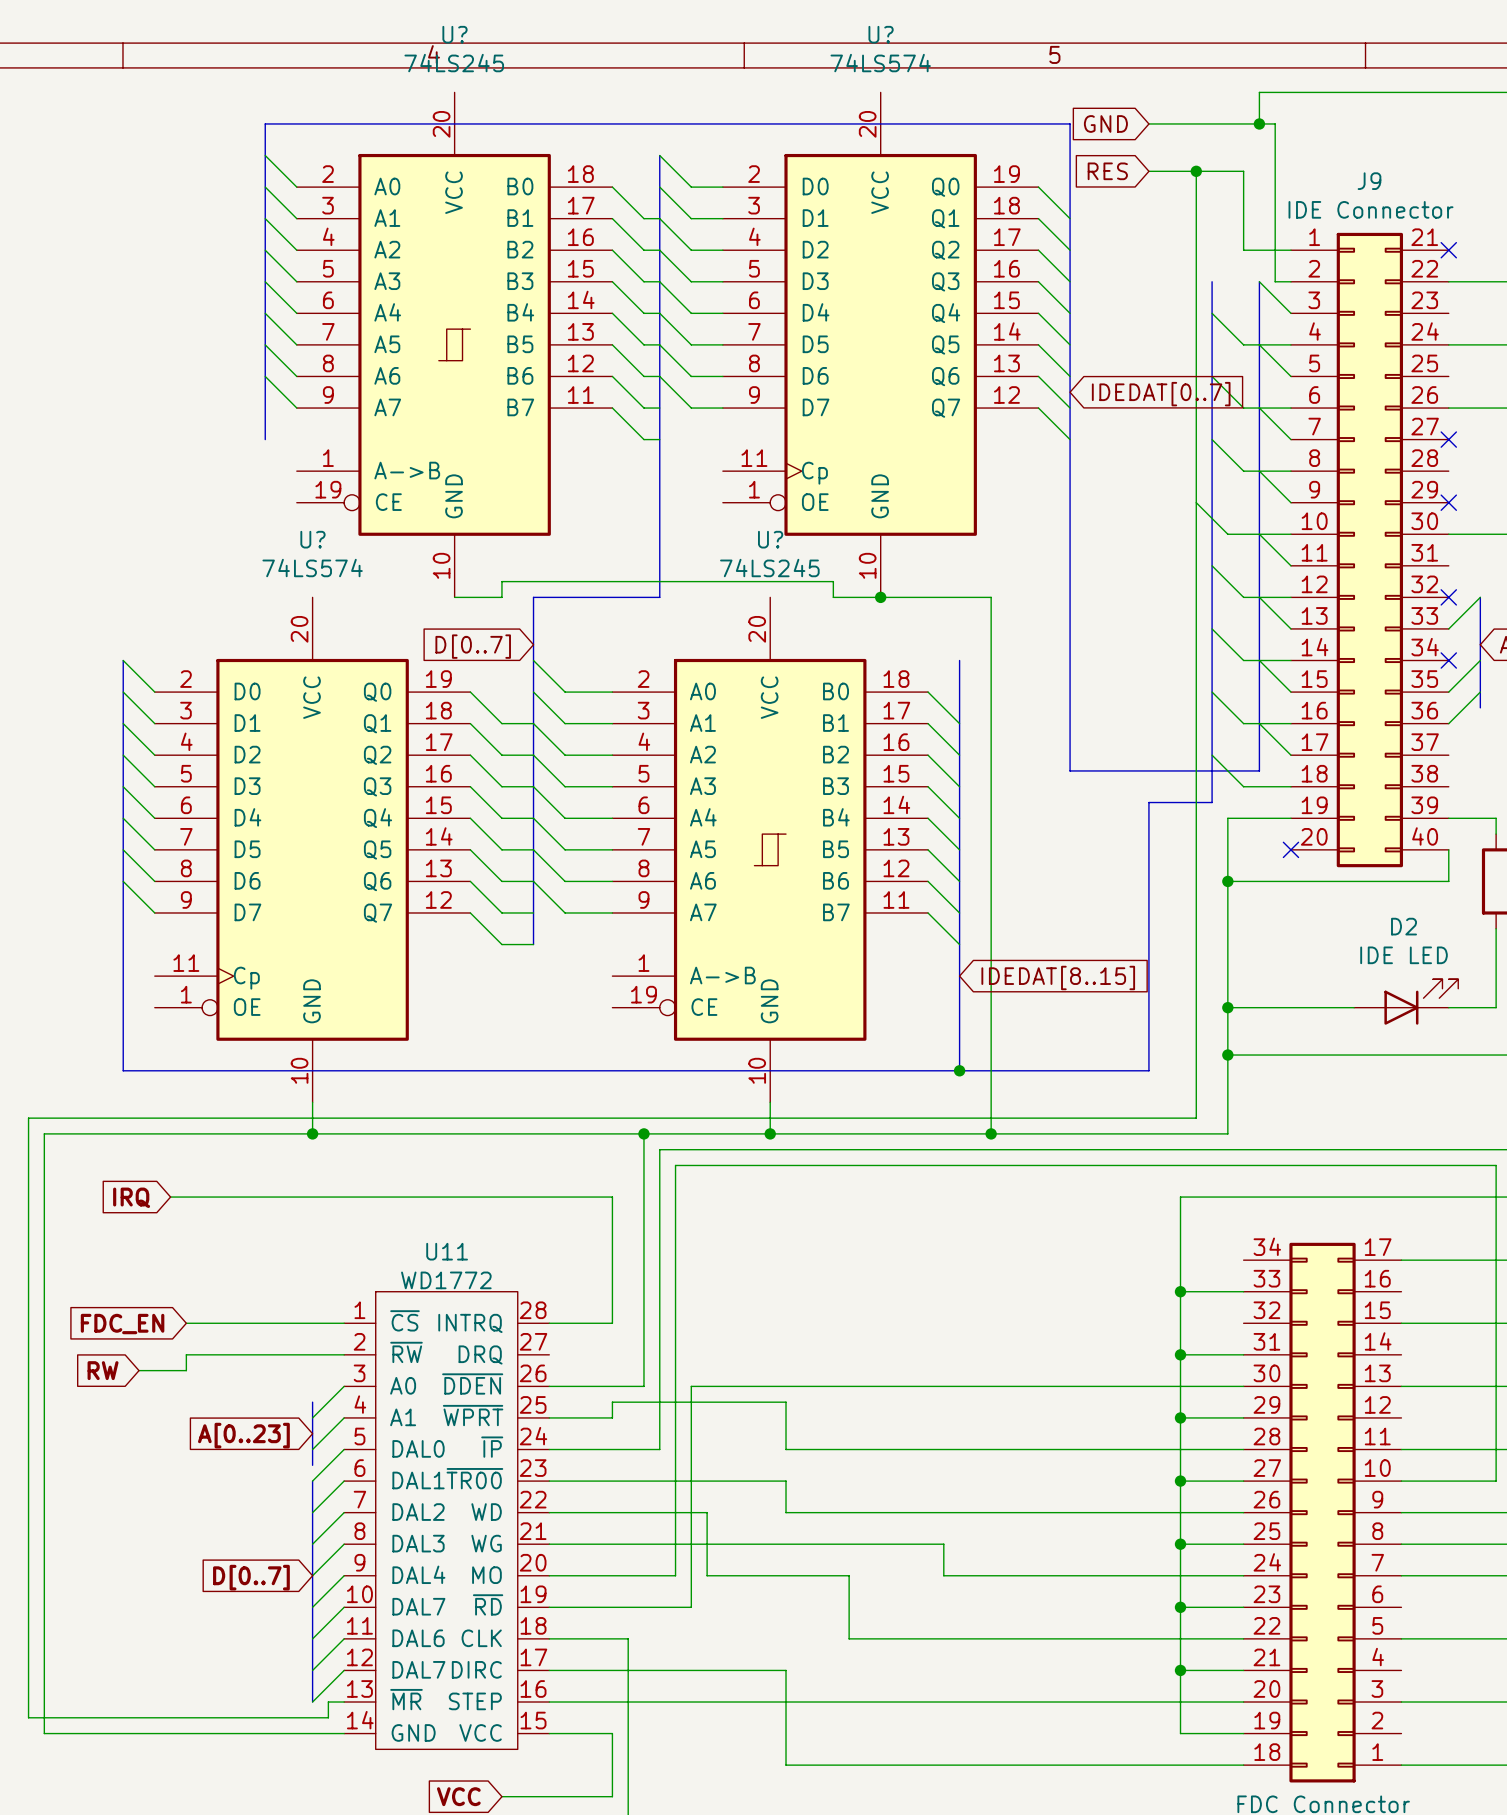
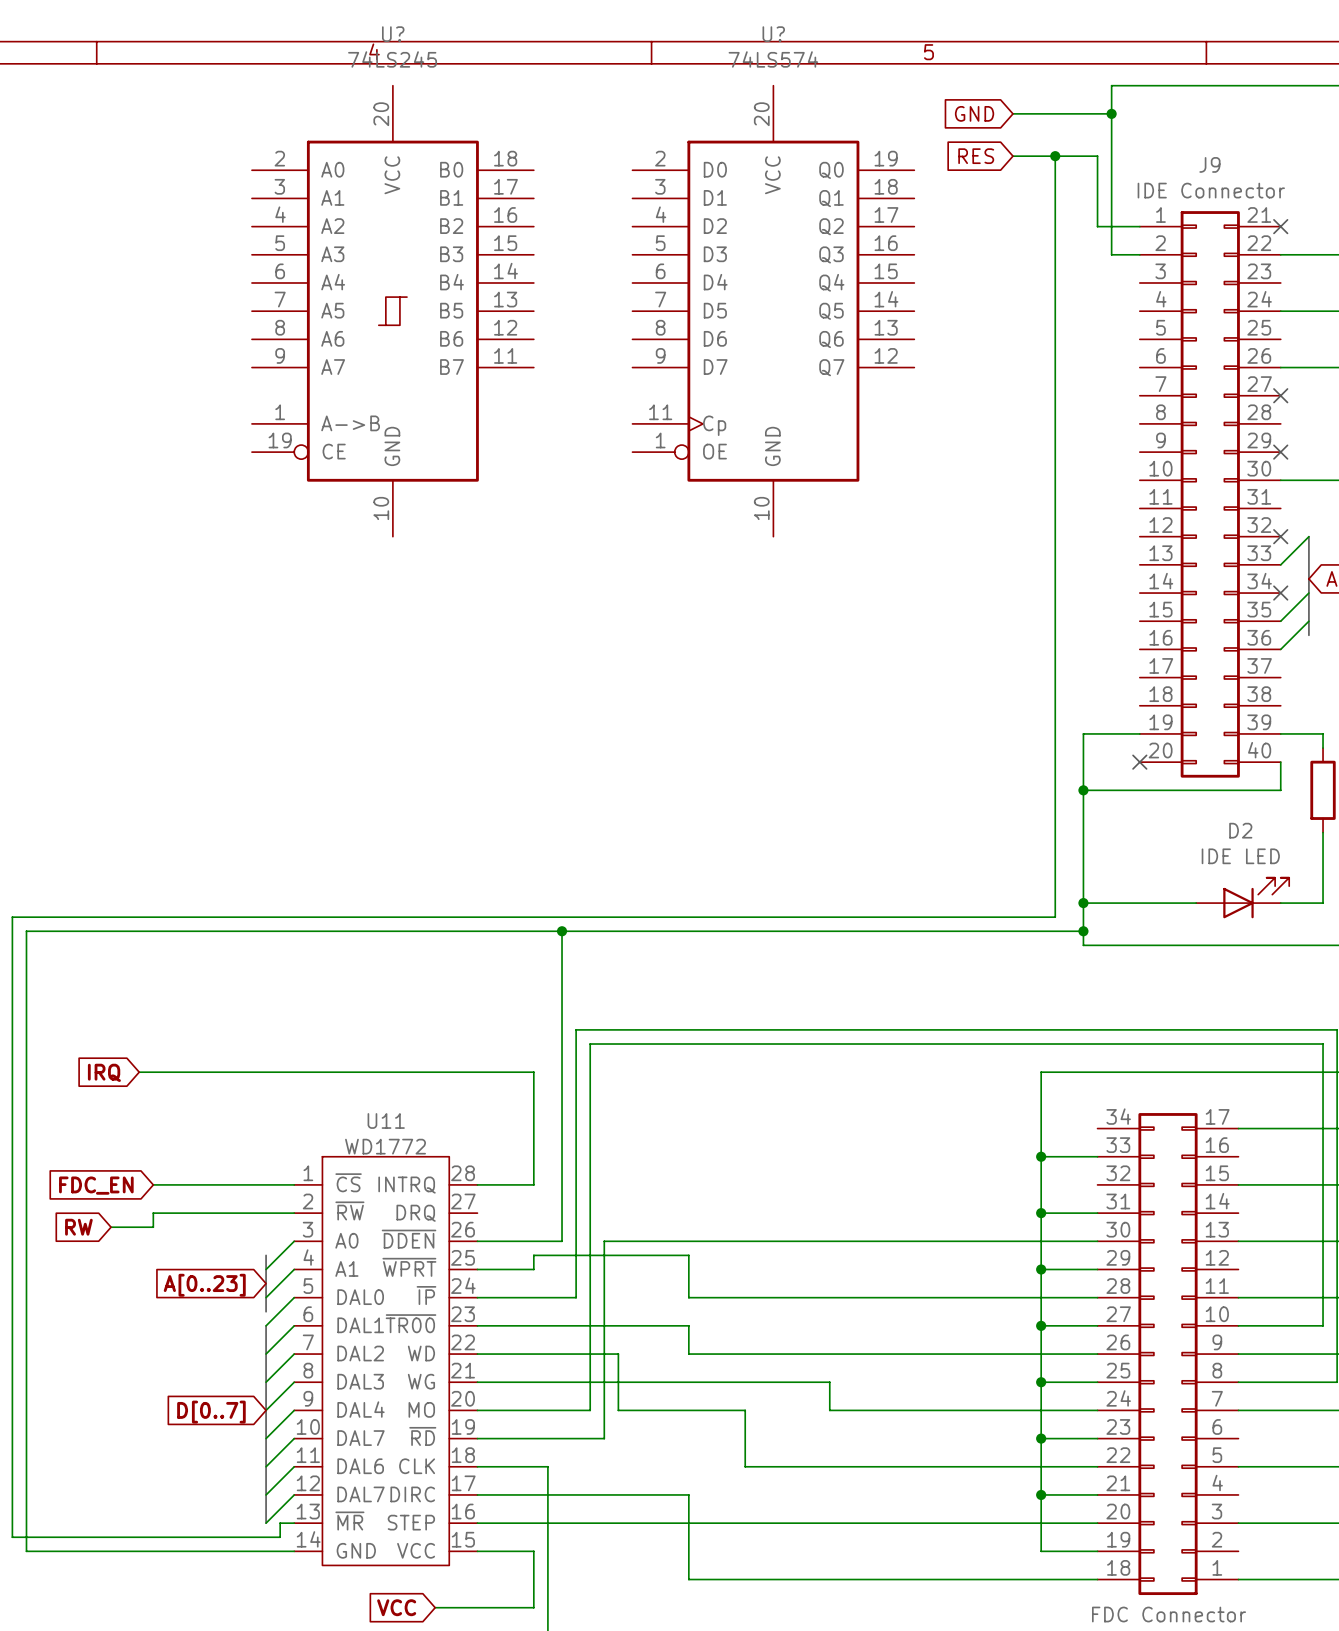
wire: (1259, 123) (1275, 123) (1275, 281) -> (1111, 113) (1111, 254) (1125, 254)
wire: (265, 155) (296, 187) -> none
wire: (659, 155) (691, 187) (722, 187) -> none
bus: (659, 155) (659, 597) (533, 597) (533, 944) -> none
wire: (265, 187) (296, 218) -> none
wire: (612, 187) (643, 218) (659, 218) (691, 250) (722, 250) -> none
wire: (659, 187) (691, 218) (722, 218) -> none
wire: (1038, 187) (1070, 218) -> none
wire: (265, 218) (296, 250) -> none
wire: (612, 218) (643, 250) (659, 250) (691, 281) (722, 281) -> none
wire: (1038, 218) (1070, 250) -> none
wire: (265, 250) (296, 281) -> none
wire: (612, 250) (643, 281) (659, 281) (691, 313) (722, 313) -> none
wire: (1038, 250) (1070, 281) -> none
wire: (265, 281) (296, 313) -> none
wire: (612, 281) (643, 313) (659, 313) (691, 344) (722, 344) -> none
wire: (1038, 281) (1070, 313) -> none
bus: (1212, 281) (1212, 802) (1148, 802) (1148, 1070) (123, 1070) (123, 660) -> none
wire: (1259, 281) (1290, 313) -> none
bus: (1259, 281) (1259, 770) (1070, 770) (1070, 123) (265, 123) (265, 439) -> none
wire: (265, 313) (296, 344) -> none
wire: (612, 313) (643, 344) (659, 344) (691, 376) (722, 376) -> none
wire: (1038, 313) (1070, 344) -> none
wire: (1212, 313) (1243, 344) (1290, 344) -> none
wire: (265, 344) (296, 376) -> none
wire: (612, 344) (643, 376) (659, 376) (691, 408) (722, 408) -> none
wire: (1038, 344) (1070, 376) -> none
wire: (1259, 344) (1290, 376) -> none
wire: (265, 376) (296, 408) -> none
wire: (612, 376) (643, 408) (659, 408) -> none
wire: (1038, 376) (1070, 408) -> none
wire: (1212, 376) (1243, 408) (1290, 408) -> none
global label: IDEDAT[0..7] (1161, 394) -> none
wire: (612, 408) (643, 439) (659, 439) -> none
wire: (1038, 408) (1070, 439) -> none
wire: (1259, 408) (1290, 439) -> none
wire: (1212, 439) (1243, 471) (1290, 471) -> none
wire: (1259, 471) (1290, 502) -> none
wire: (1196, 502) (1227, 534) (1290, 534) -> none
wire: (1259, 534) (1290, 565) -> none
wire: (1212, 565) (1243, 597) (1290, 597) -> none
wire: (454, 597) (501, 597) (501, 581) (833, 581) (833, 597) (991, 597) (991, 1133) -> none
junction: (880, 597) -> none
wire: (1259, 597) (1290, 628) -> none
wire: (1212, 628) (1243, 660) (1290, 660) -> none
global label: D[0..7] (473, 646) -> none
wire: (123, 660) (154, 692) -> none
wire: (533, 660) (565, 692) (612, 692) -> none
bus: (959, 660) (959, 1070) -> none
wire: (1259, 660) (1290, 692) -> none
wire: (123, 692) (154, 723) -> none
wire: (470, 692) (501, 723) (533, 723) (565, 755) (612, 755) -> none
wire: (533, 692) (565, 723) (612, 723) -> none
wire: (928, 692) (959, 723) -> none
wire: (1212, 692) (1243, 723) (1290, 723) -> none
wire: (123, 723) (154, 755) -> none
wire: (470, 723) (501, 755) (533, 755) (565, 786) (612, 786) -> none
wire: (928, 723) (959, 755) -> none
wire: (1259, 723) (1290, 755) -> none
wire: (123, 755) (154, 786) -> none
wire: (470, 755) (501, 786) (533, 786) (565, 818) (612, 818) -> none
wire: (928, 755) (959, 786) -> none
wire: (1212, 755) (1243, 786) (1290, 786) -> none
wire: (123, 786) (154, 818) -> none
wire: (470, 786) (501, 818) (533, 818) (565, 849) (612, 849) -> none
wire: (928, 786) (959, 818) -> none
wire: (123, 818) (154, 849) -> none
wire: (470, 818) (501, 849) (533, 849) (565, 881) (612, 881) -> none
wire: (928, 818) (959, 849) -> none
wire: (123, 849) (154, 881) -> none
U?: 74LS574 (312, 849) -> none
wire: (470, 849) (501, 881) (533, 881) (565, 912) (612, 912) -> none
U?: 74LS245 (770, 849) -> none
wire: (928, 849) (959, 881) -> none
wire: (123, 881) (154, 912) -> none
wire: (470, 881) (501, 912) (533, 912) -> none
wire: (928, 881) (959, 912) -> none
wire: (470, 912) (501, 944) (533, 944) -> none
wire: (928, 912) (959, 944) -> none
global label: IDEDAT[8..15] (1058, 977) -> none
wire: (1196, 1023) (1196, 1118) (28, 1118) -> (1055, 917) (12, 917) (12, 1001)
wire: none -> (562, 931) (562, 1015)
junction: none -> (562, 931)
wire: (1227, 1055) (1227, 1133) (44, 1133) -> (1083, 931) (26, 931) (26, 1015)
junction position: (1227, 1055) -> (1083, 931)
junction: (959, 1070) -> none
wire: (312, 1102) (312, 1133) -> none
wire: (770, 1102) (770, 1133) -> none
junction: (312, 1133) -> none
junction: (643, 1133) -> none
junction: (770, 1133) -> none
junction: (991, 1133) -> none

